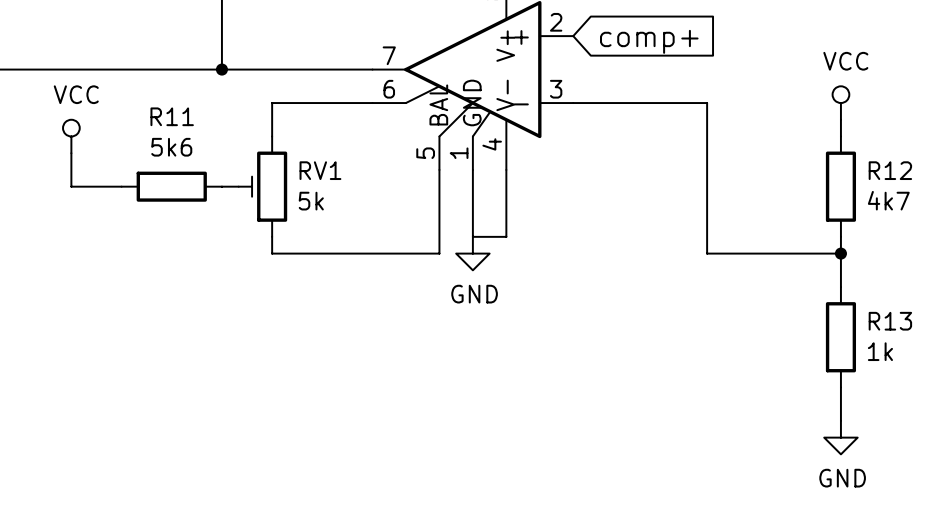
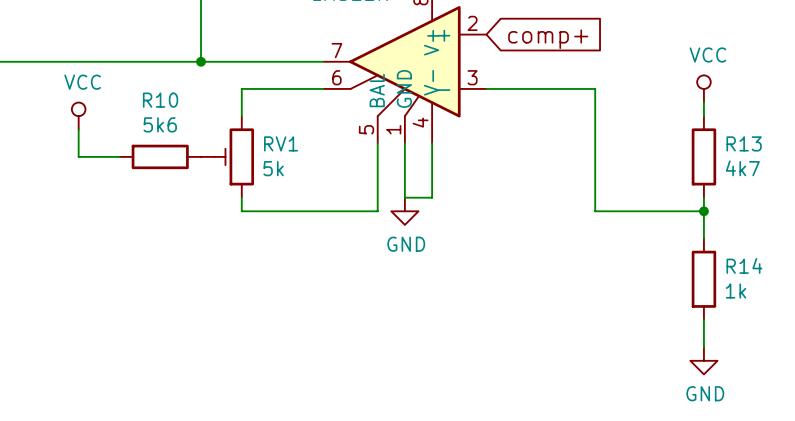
R11 name: R11 (172, 116) -> R10 (160, 100)
R12 name: R12 (890, 170) -> R13 (744, 143)
R13 name: R13 (890, 321) -> R14 (744, 265)

